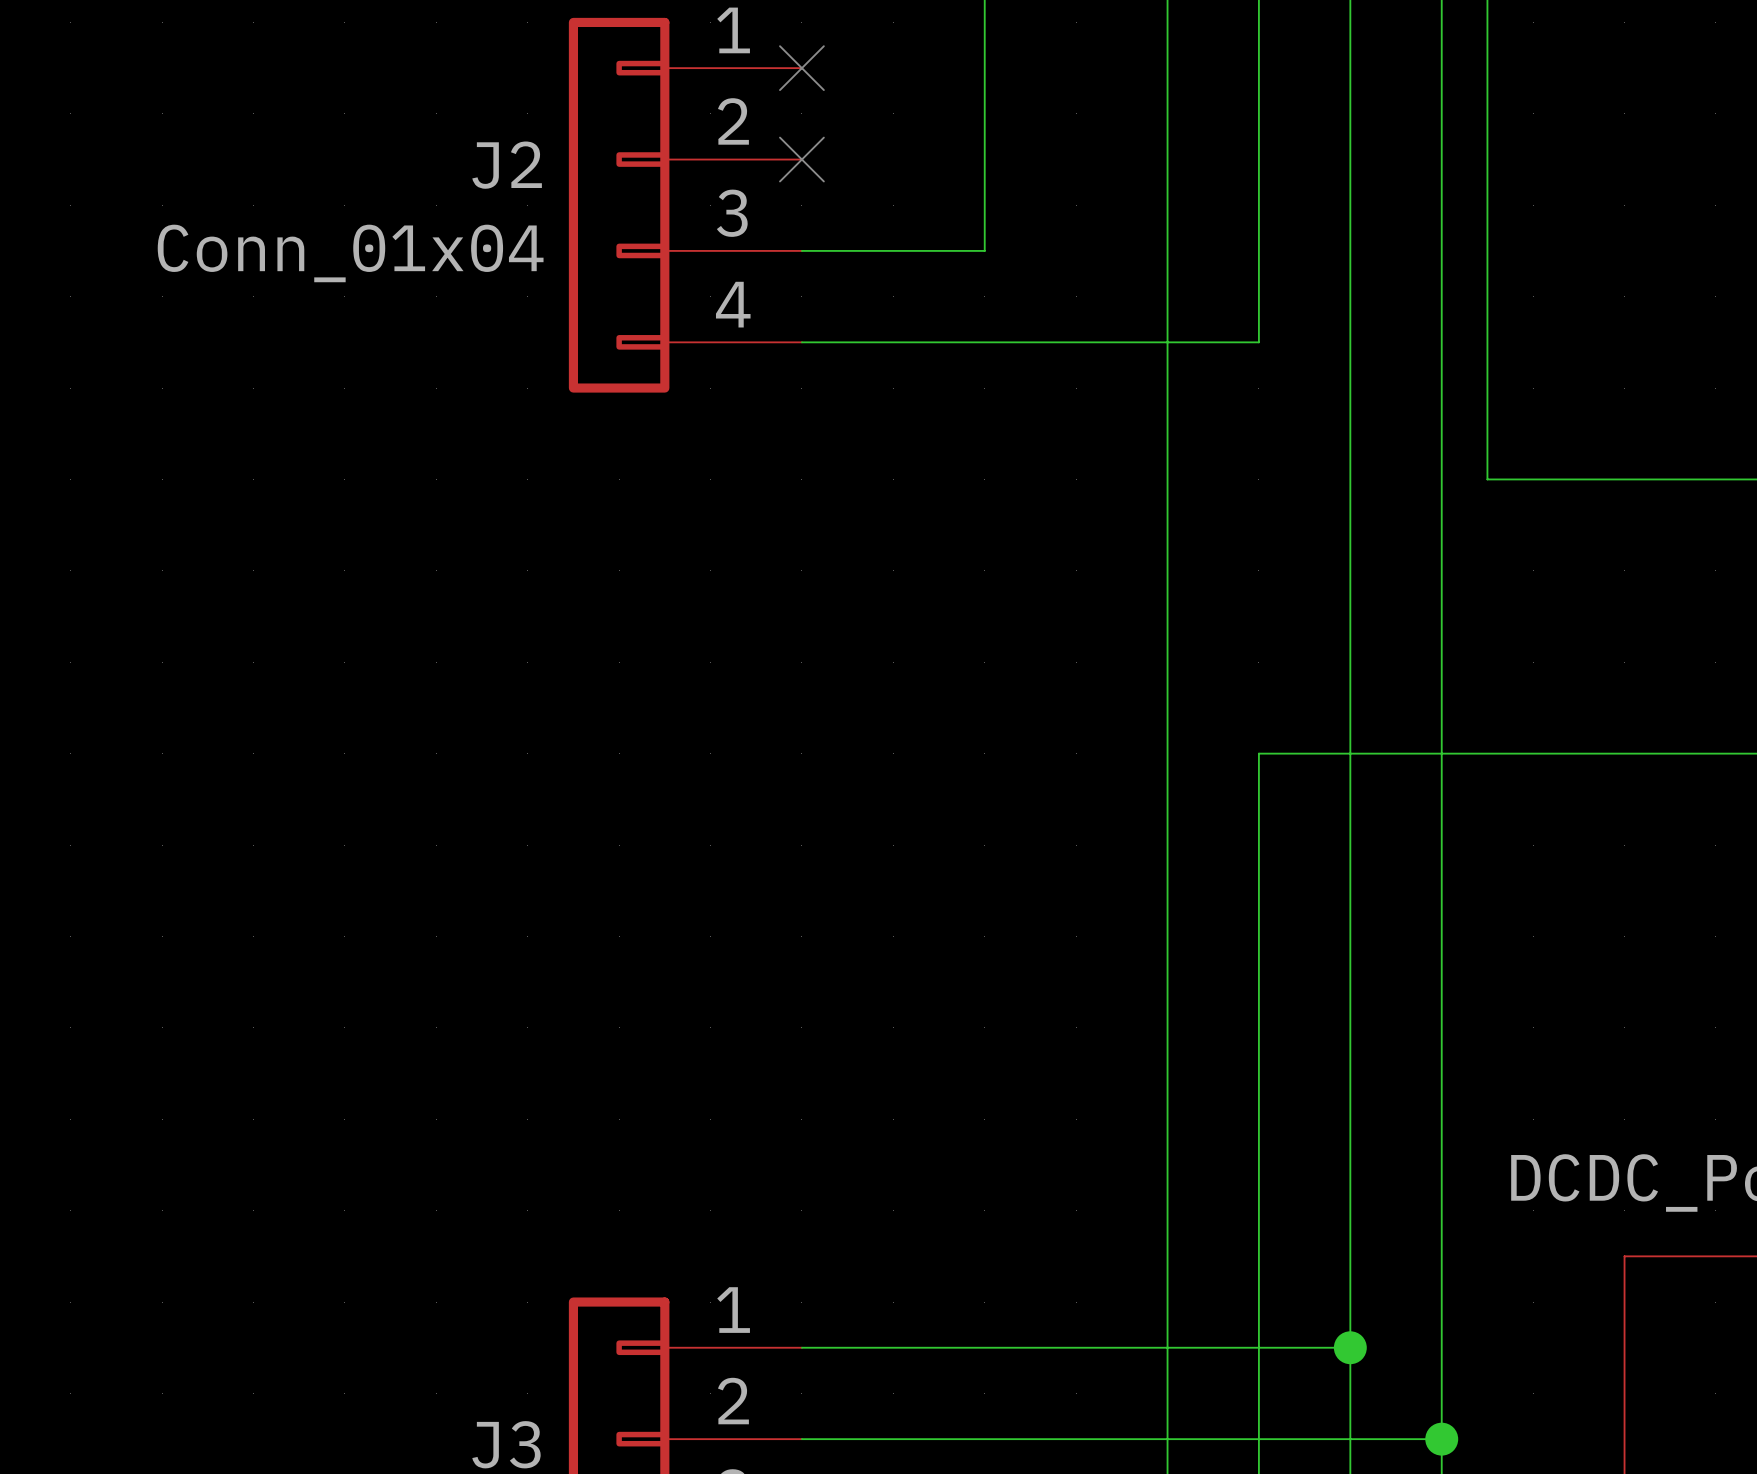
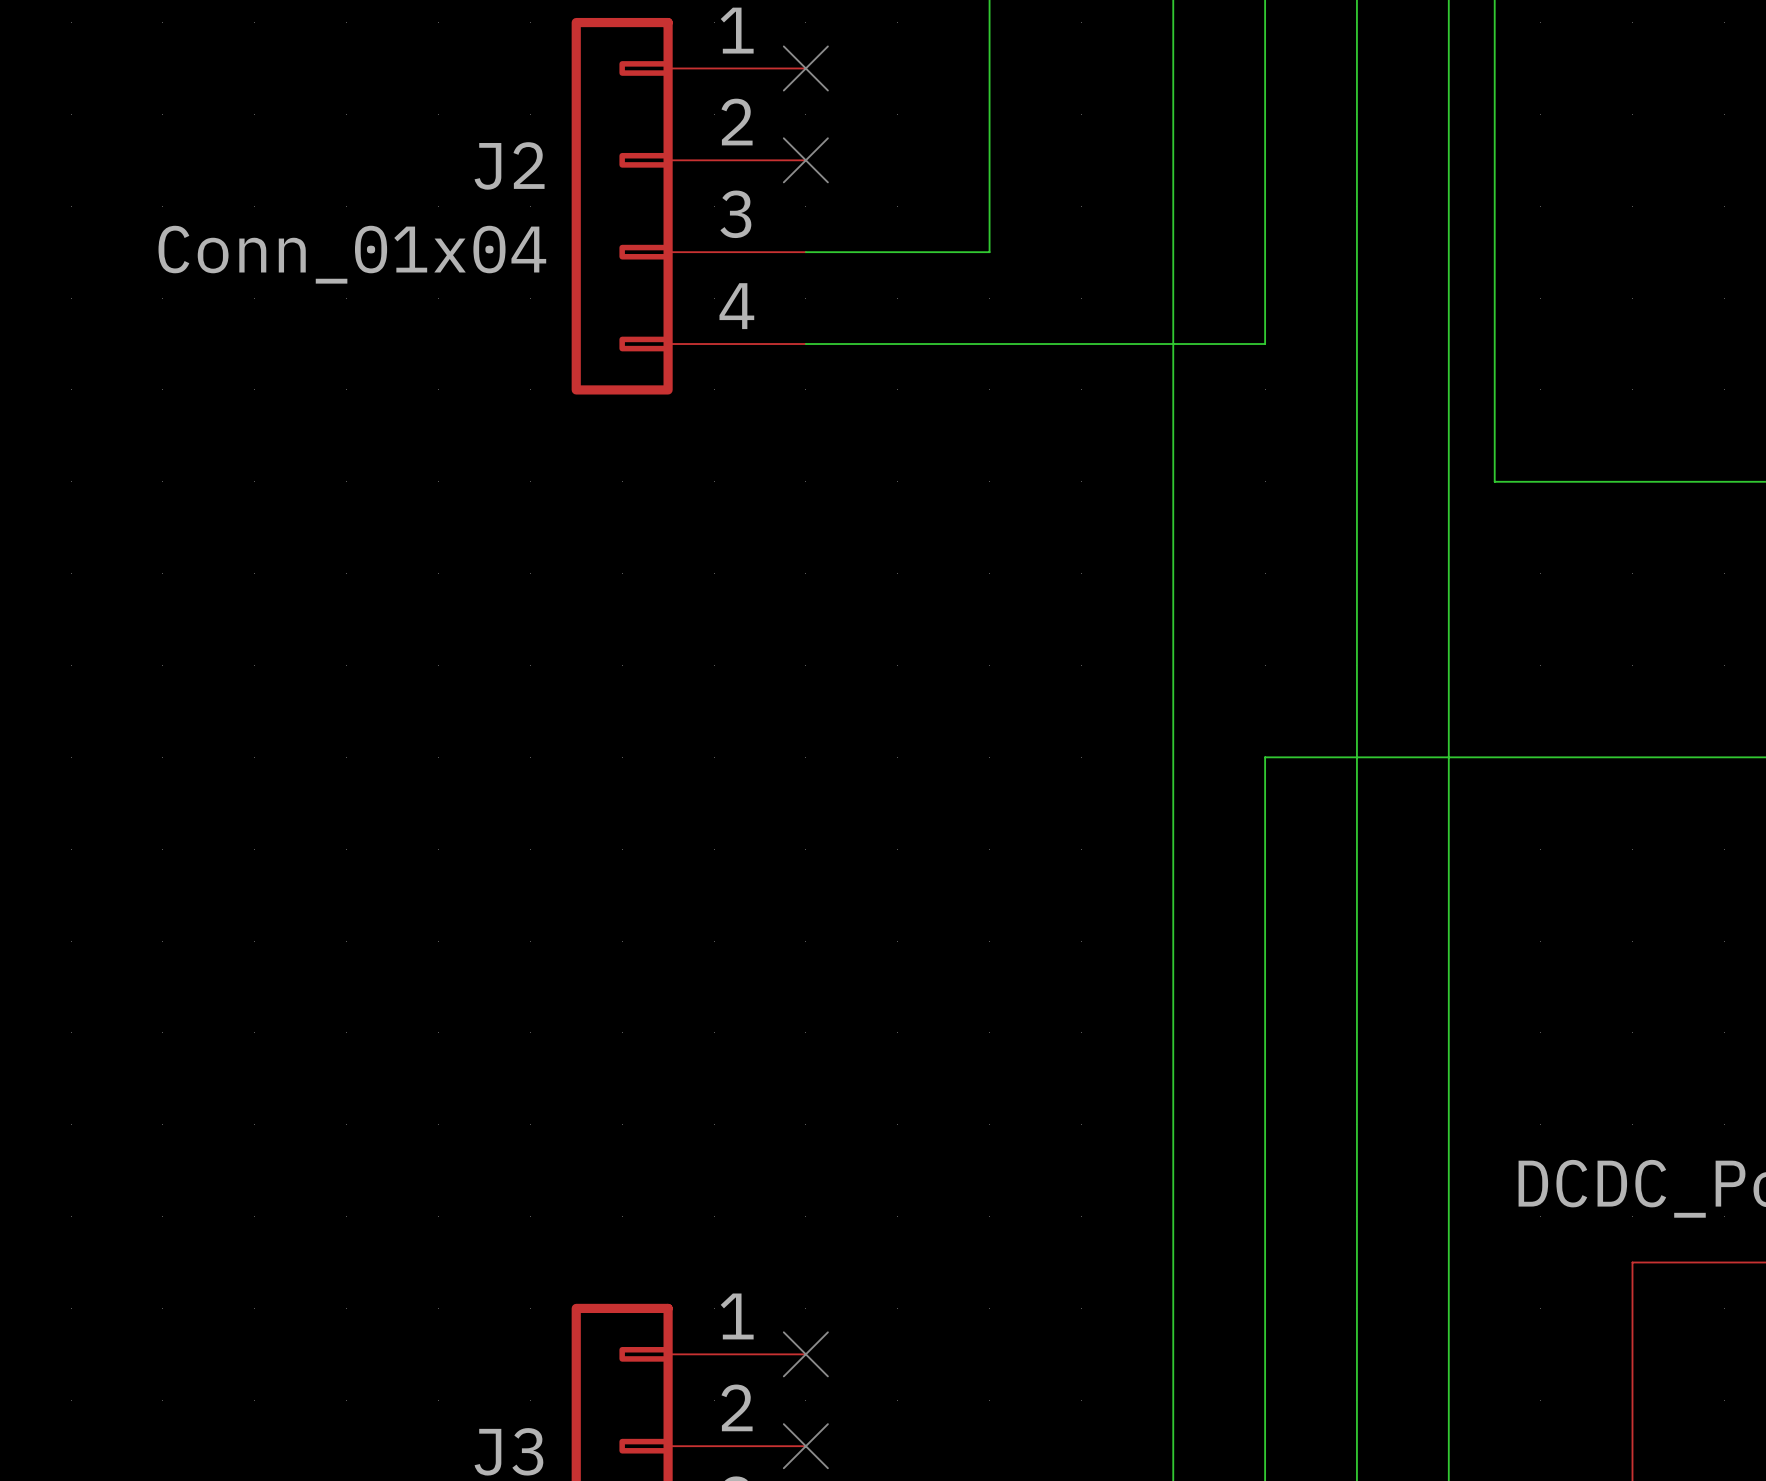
wire: (801, 1347) (1350, 1347) -> none
no-connect mark: none -> (805, 1354)
junction: (1350, 1347) -> none
wire: (801, 1439) (1441, 1439) -> none
no-connect mark: none -> (805, 1446)
junction: (1441, 1439) -> none

